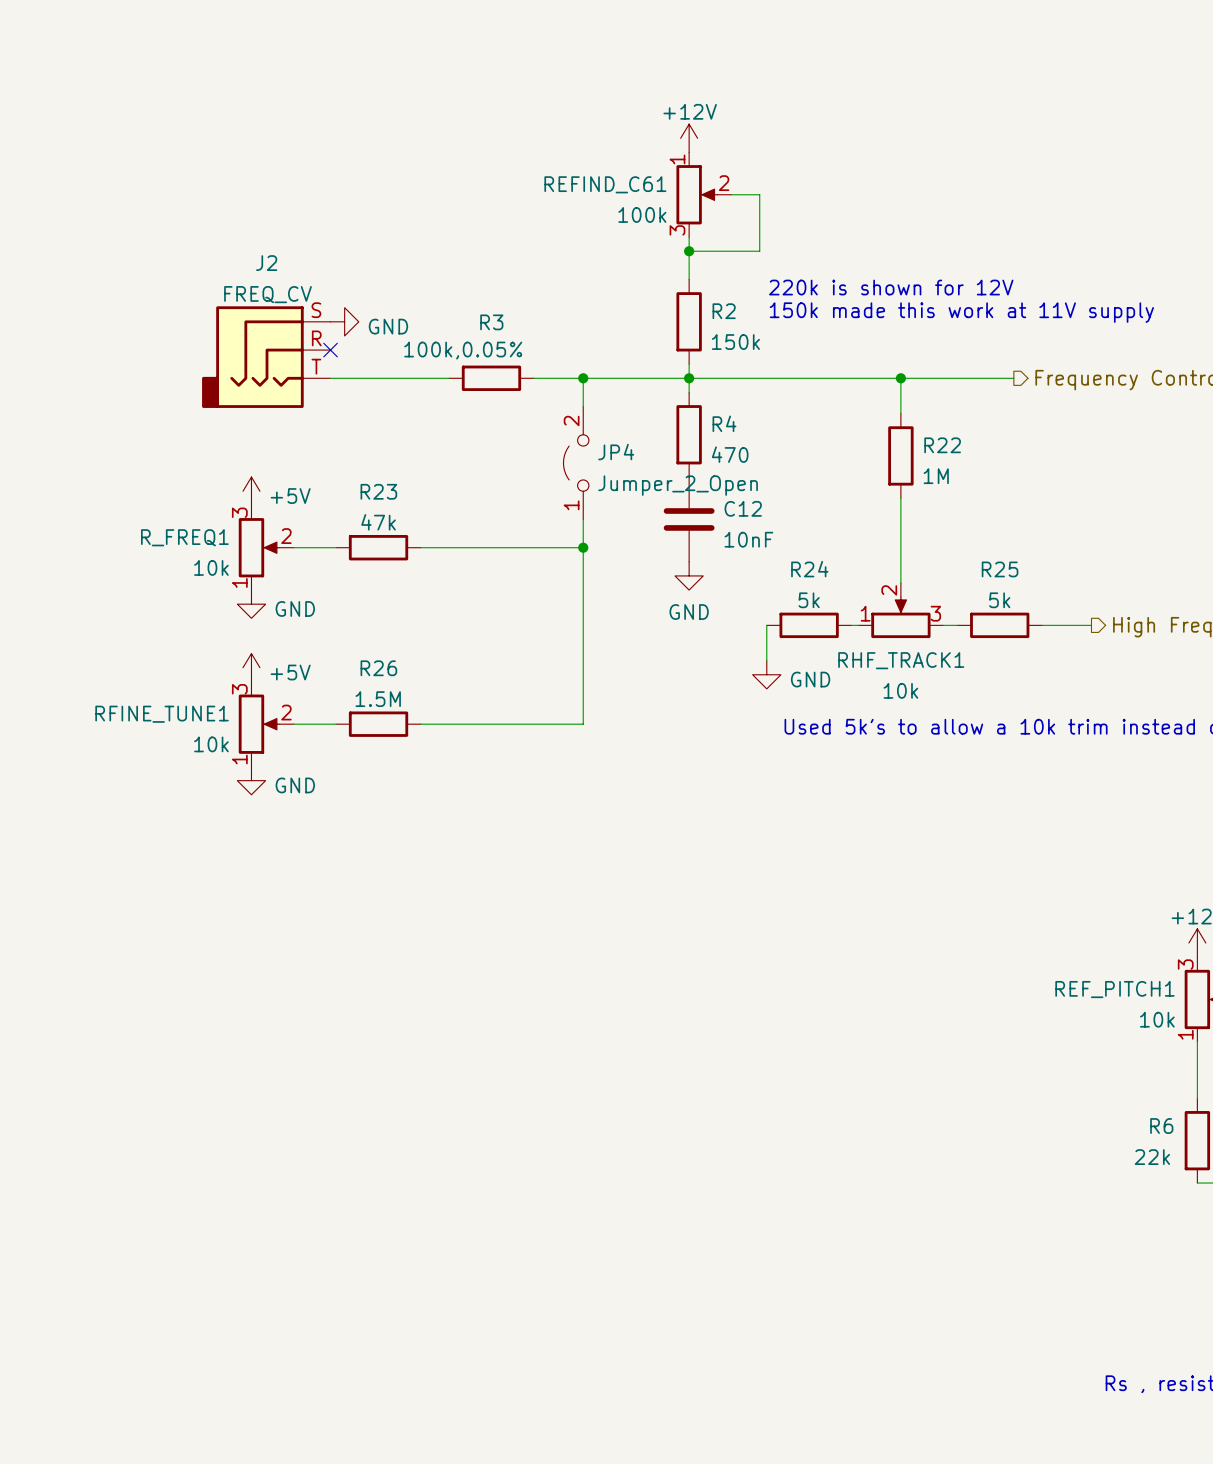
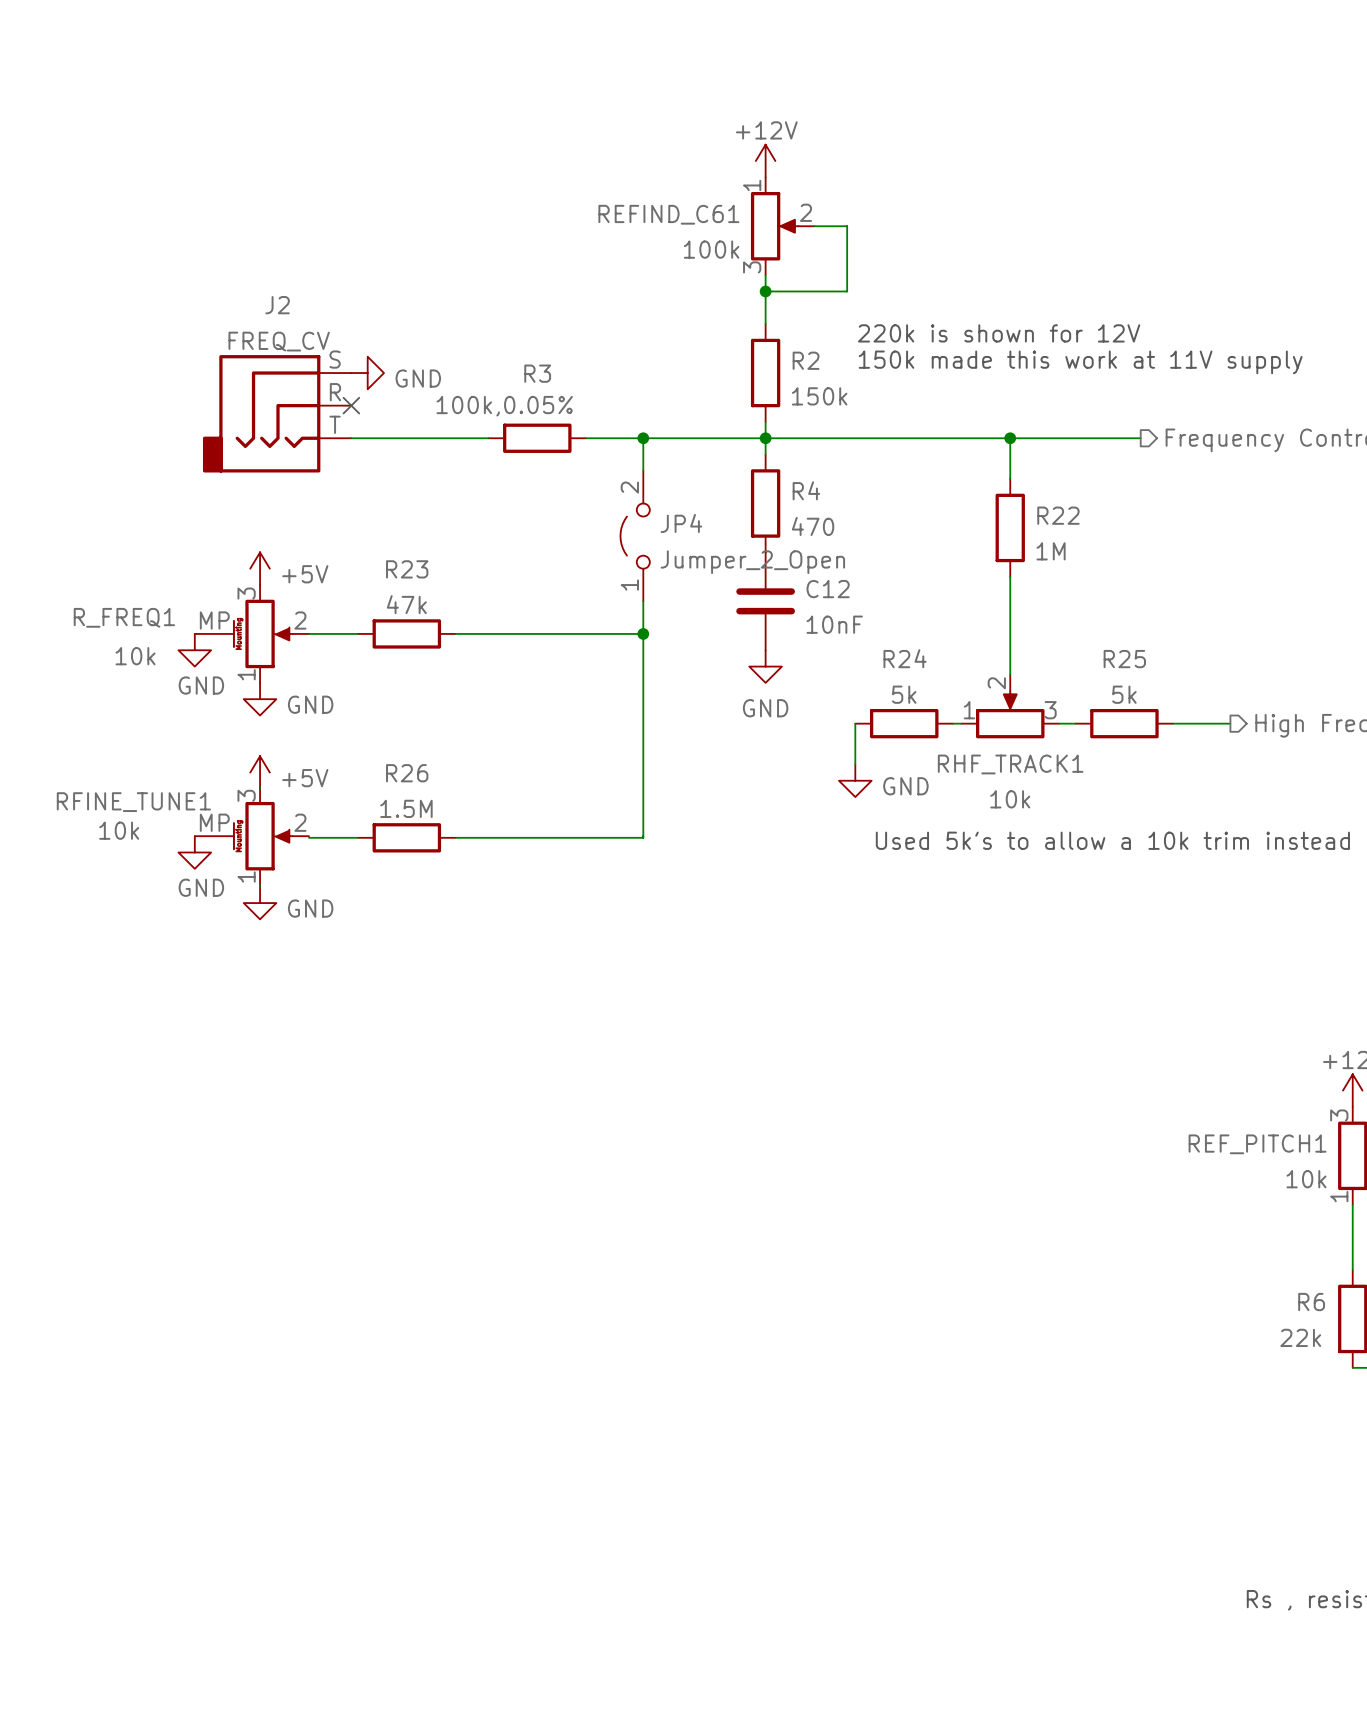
R_FREQ1 symbol: [238, 505, 294, 591] -> [194, 585, 309, 683]
R_FREQ1 name position: R_FREQ1 (184, 537) -> R_FREQ1 (124, 617)
power symbol: none -> GND (194, 650)
R_FREQ1 value position: 10k (211, 567) -> 10k (135, 656)
RFINE_TUNE1 symbol: [238, 681, 294, 767] -> [194, 787, 309, 886]
power symbol: none -> GND (194, 852)
RFINE_TUNE1 value position: 10k (211, 744) -> 10k (119, 830)

